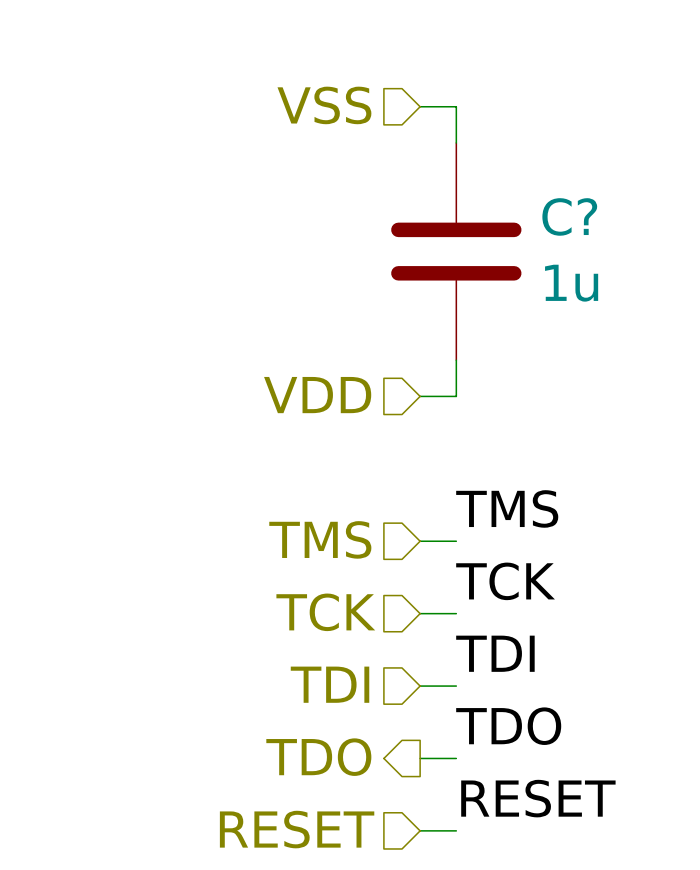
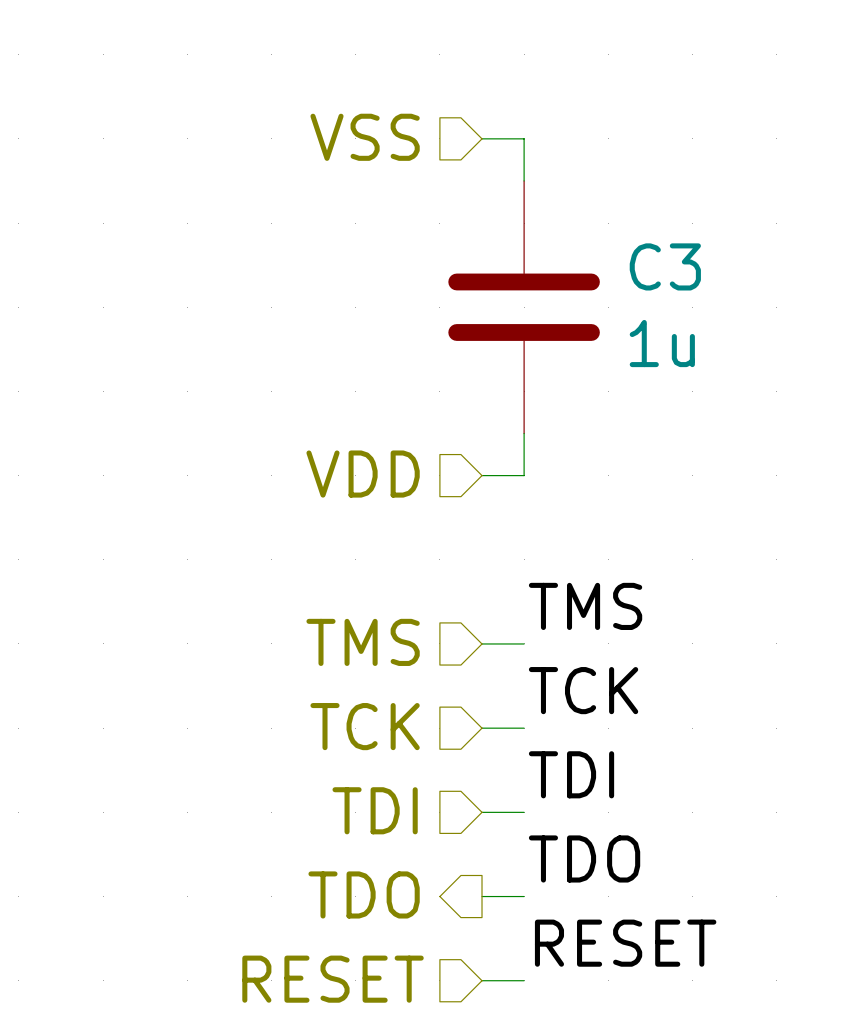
C? name: C? (569, 216) -> C3 (665, 266)

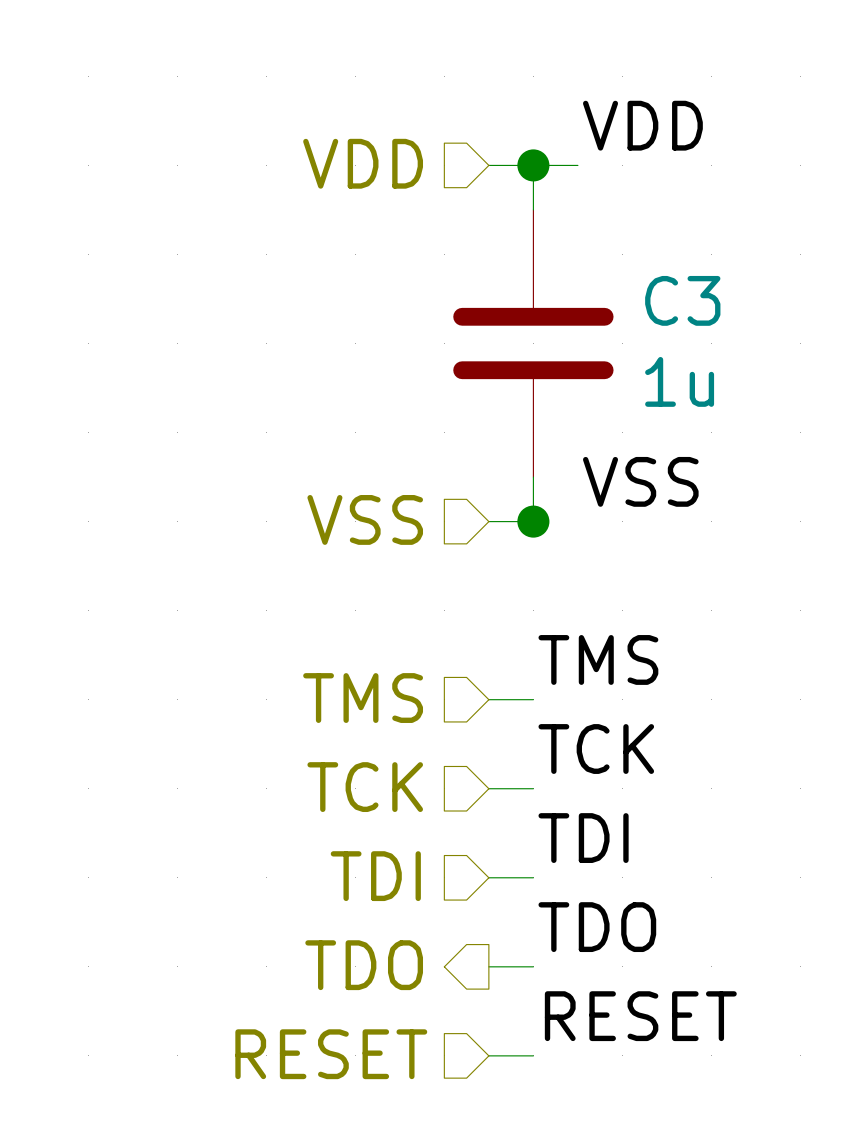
label: none -> VDD (642, 125)
hierarchical label: VSS (365, 137) -> VDD (363, 163)
wire: none -> (533, 165) (577, 165)
junction: none -> (533, 165)
label: none -> VSS (640, 481)
hierarchical label: VDD (363, 474) -> VSS (365, 519)
junction: none -> (533, 521)

